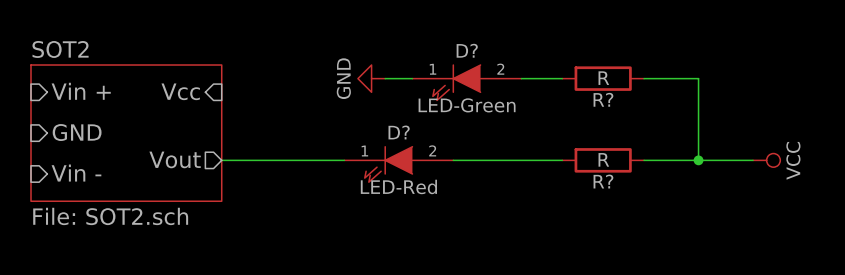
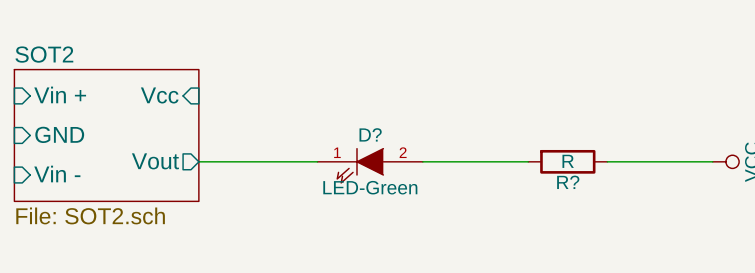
power symbol: GND (371, 78) -> none
wire: (385, 78) (412, 78) -> none
wire: (521, 78) (562, 78) -> none
R?: R (603, 78) -> none
wire: (644, 78) (698, 78) (698, 160) -> none
D?: LED-Green (466, 82) -> none
junction: (698, 160) -> none
D? value: LED-Red (398, 186) -> LED-Green (370, 187)

